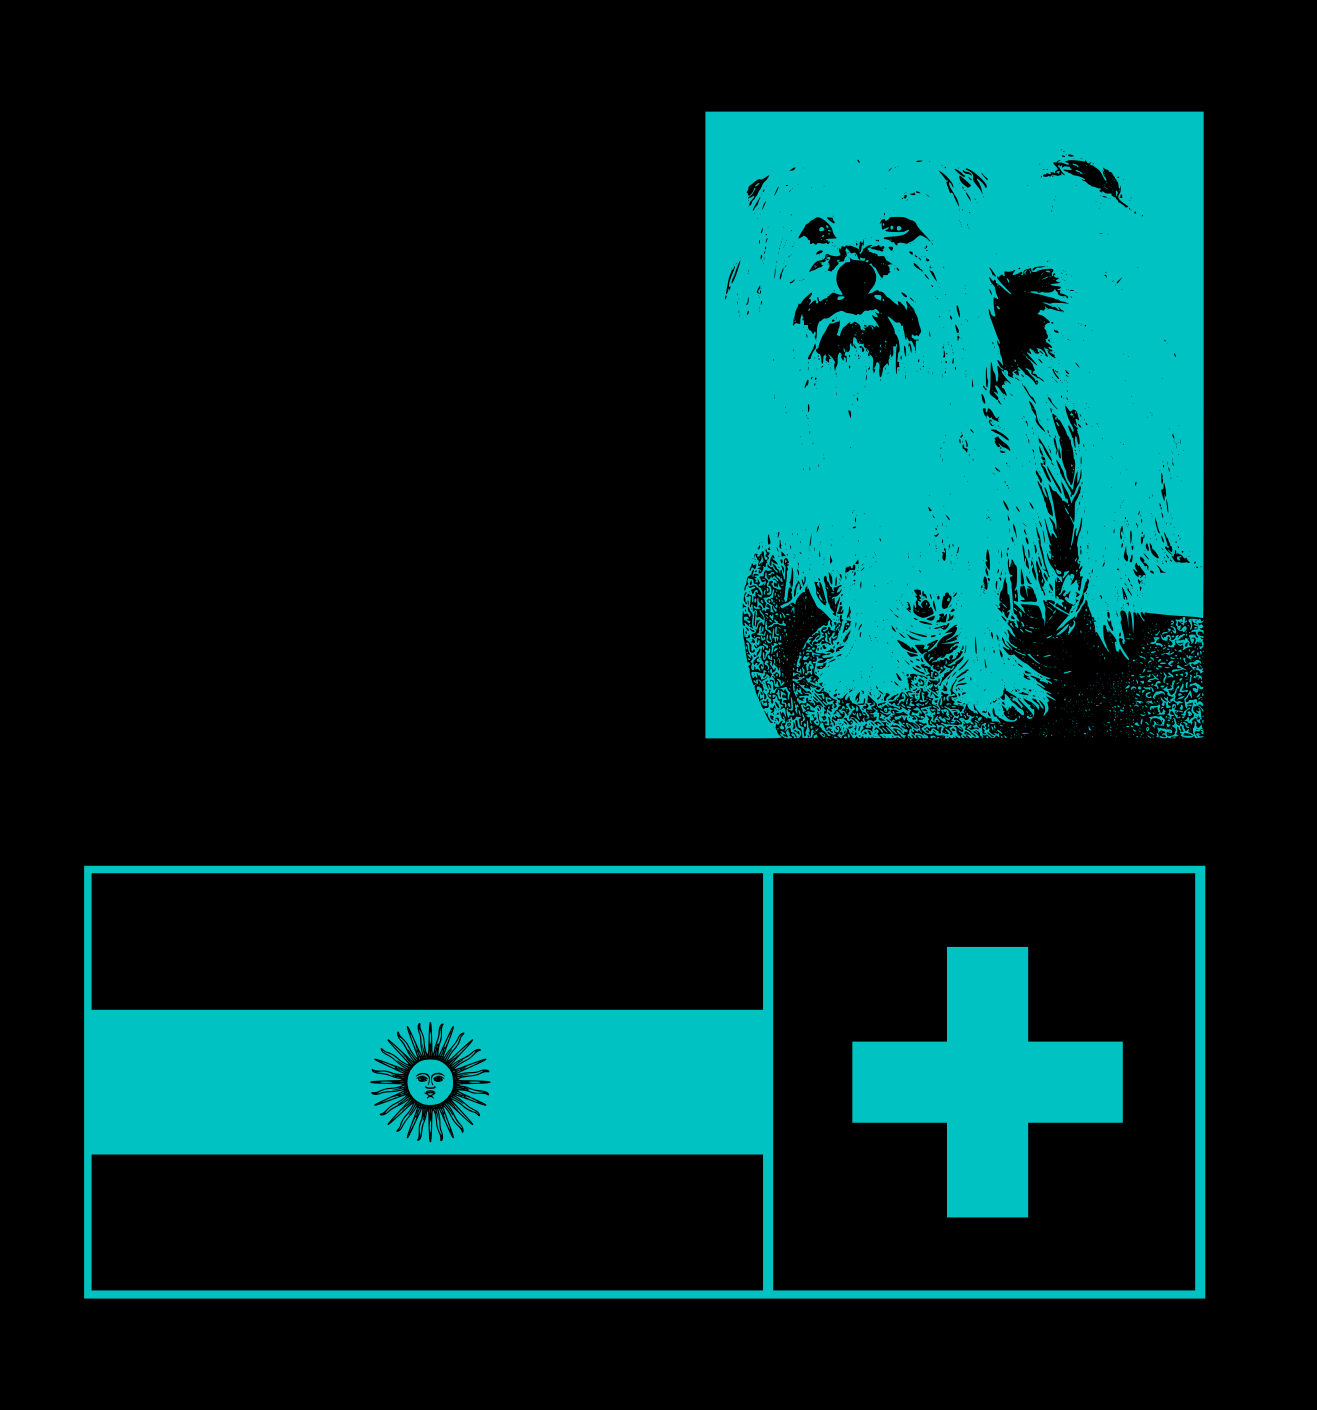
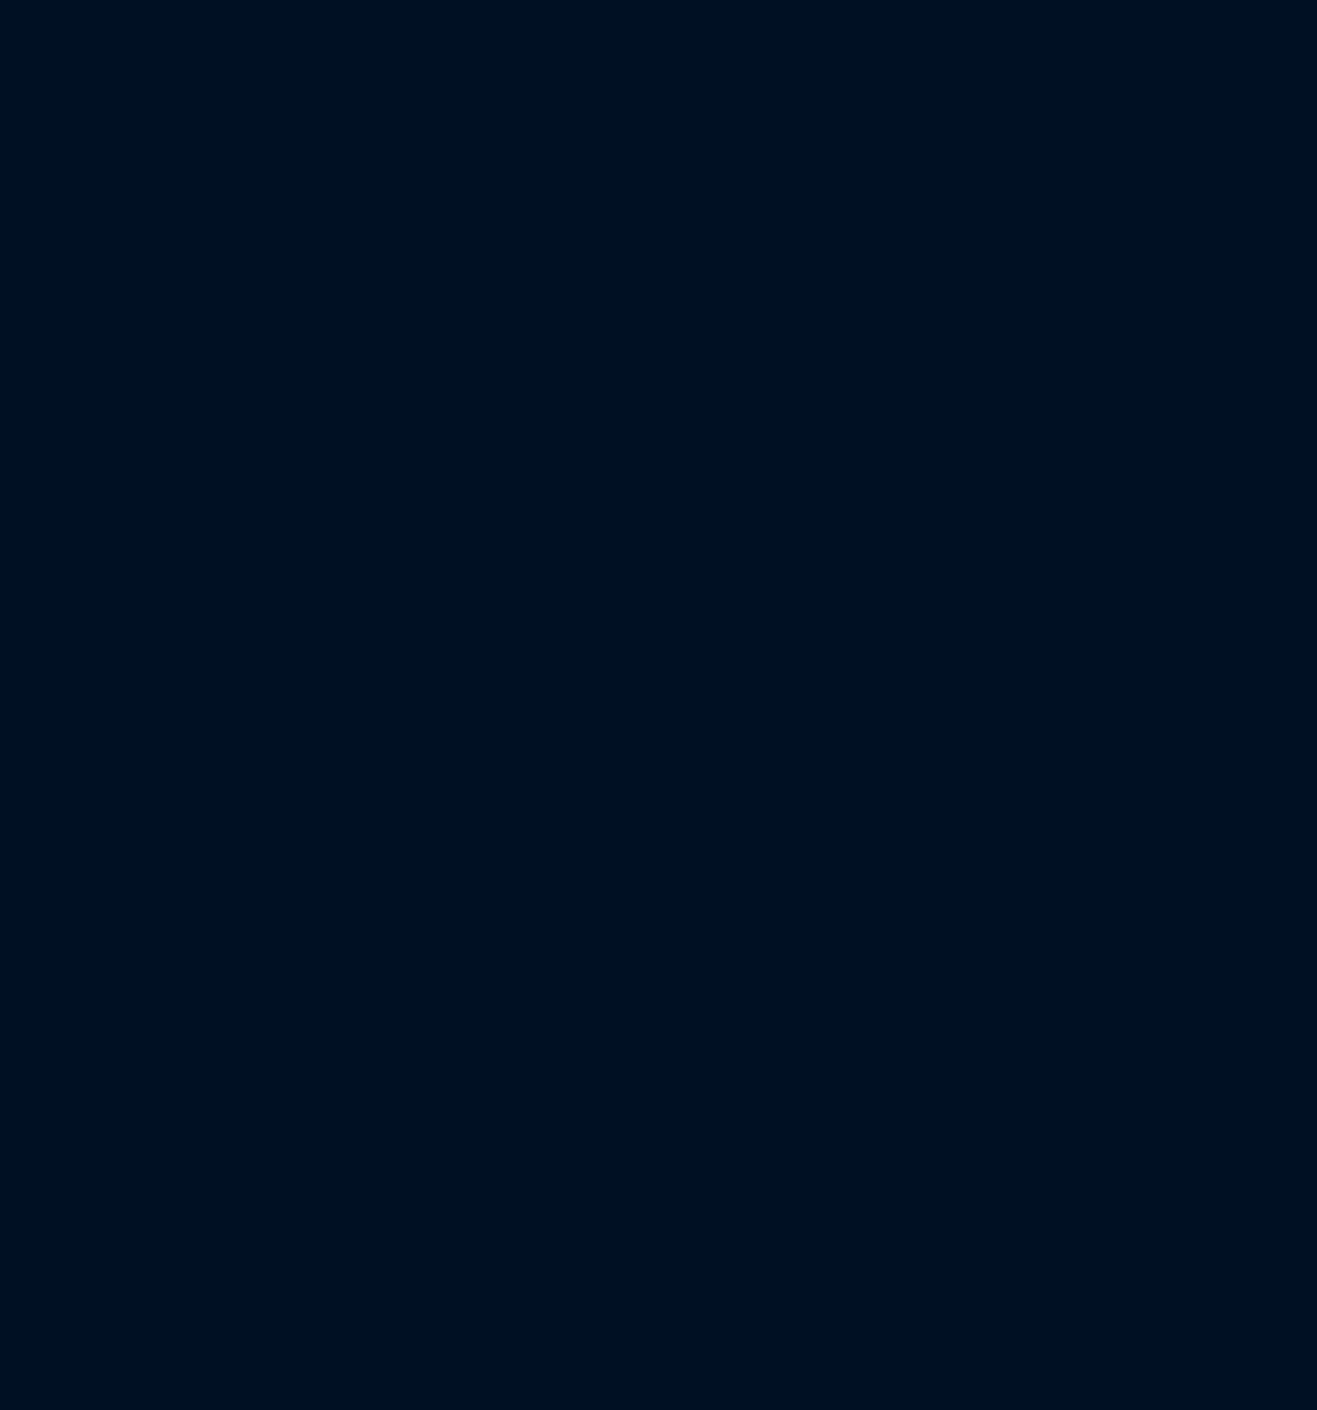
part: (954, 424) -> none
part: (644, 1082) -> none

